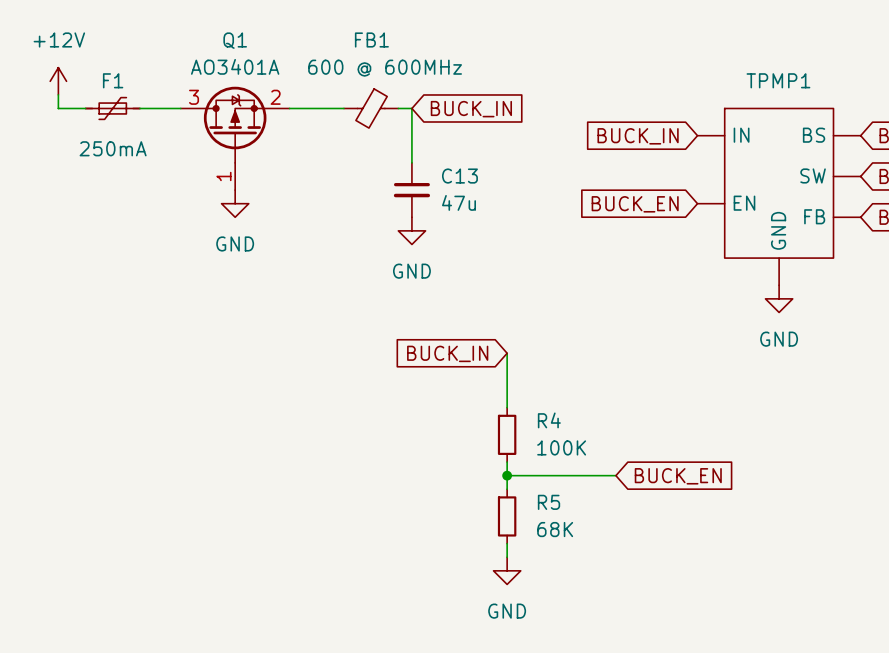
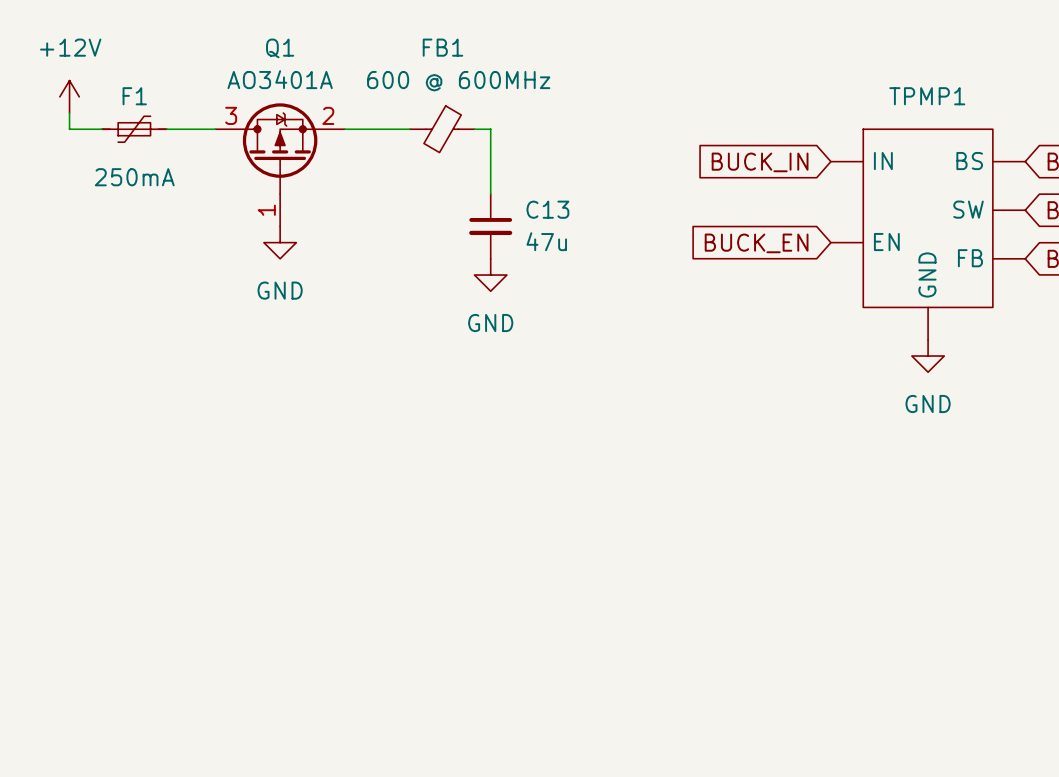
global label: BUCK_IN (471, 109) -> none
global label: BUCK_IN (447, 353) -> none
wire: (507, 353) (507, 407) -> none
R4: 100K (507, 434) -> none
wire: (507, 462) (507, 489) -> none
wire: (507, 475) (615, 475) -> none
junction: (507, 475) -> none
global label: BUCK_EN (678, 476) -> none
R5: 68K (507, 516) -> none
wire: (507, 543) (507, 557) -> none
power symbol: GND (507, 570) -> none

